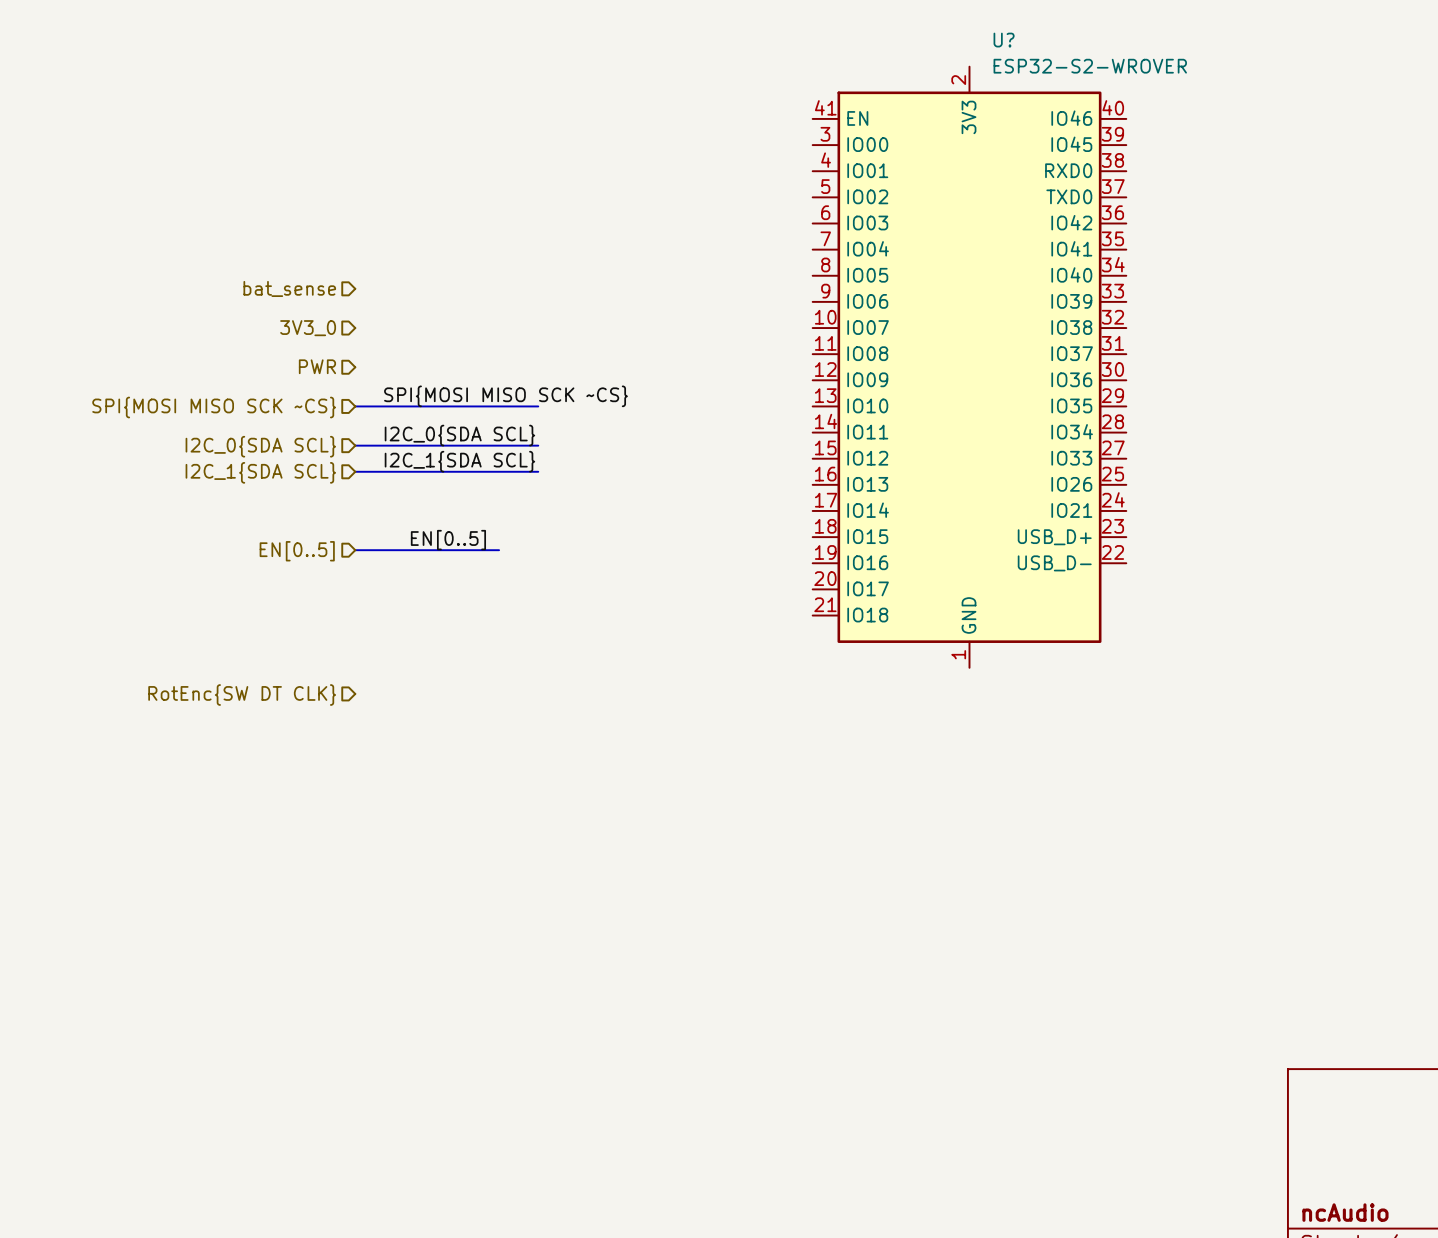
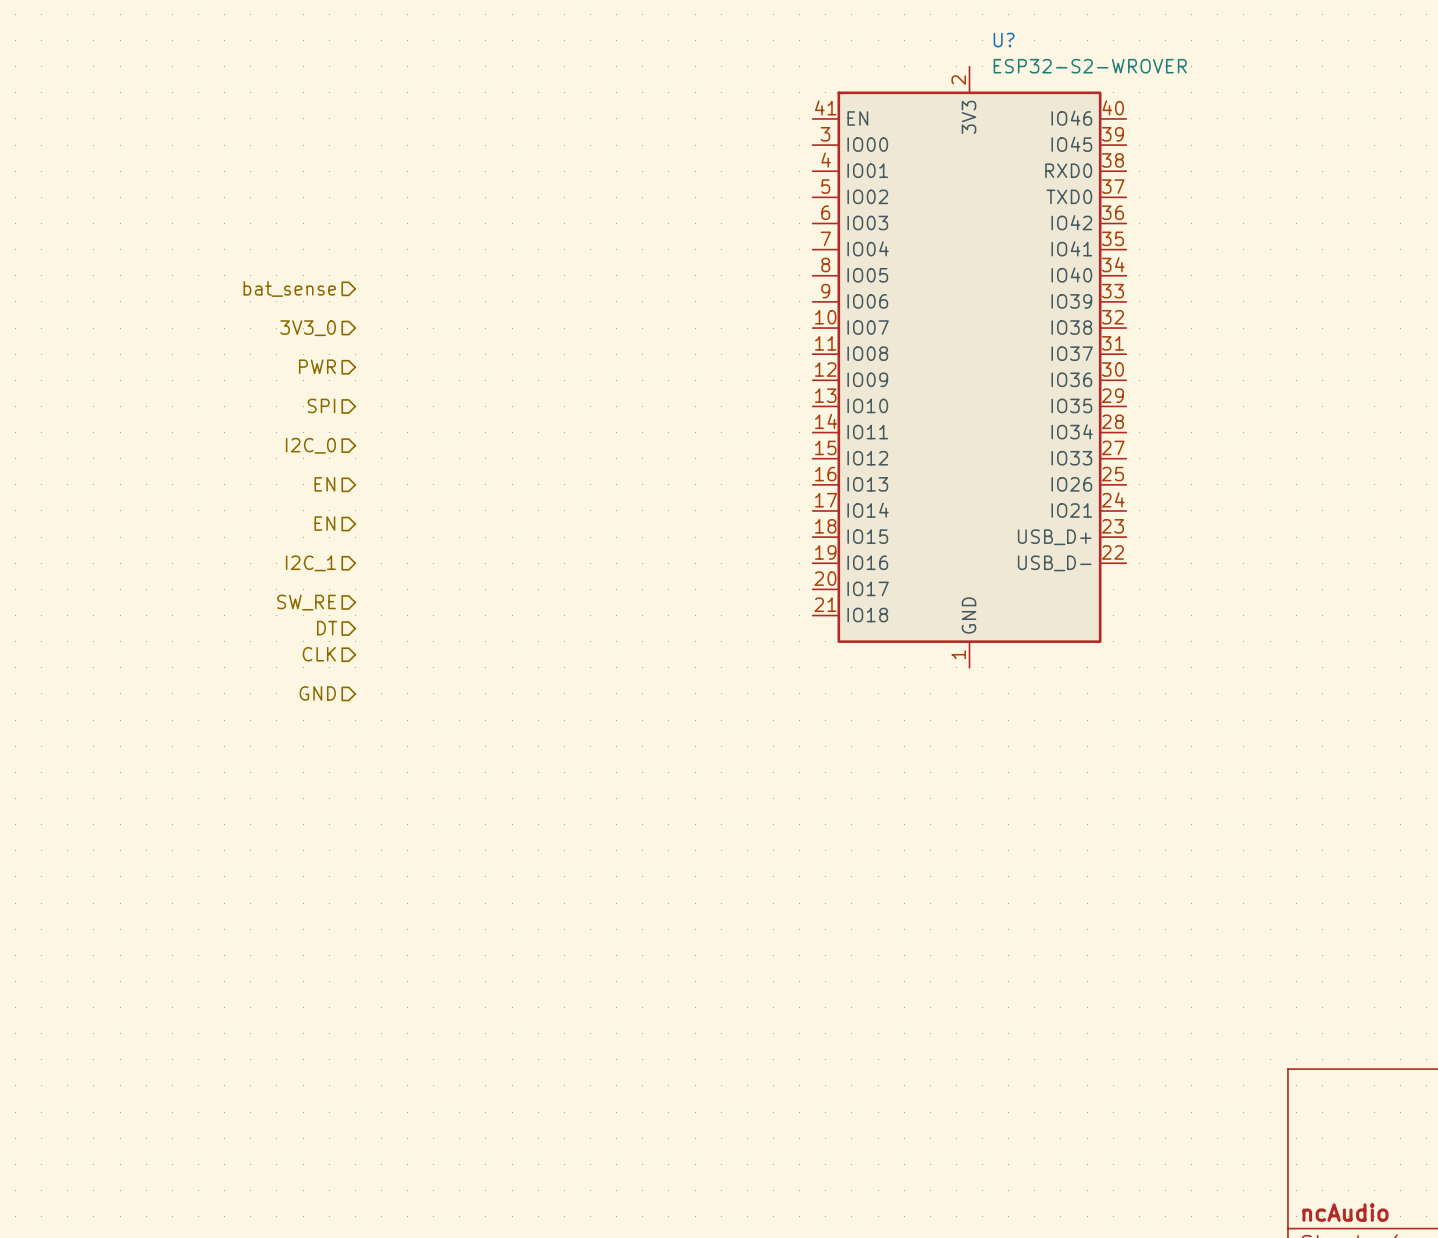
label: SPI{MOSI MISO SCK ~CS} (505, 396) -> none
bus: (355, 406) (538, 406) -> none
hierarchical label: SPI{MOSI MISO SCK ~CS} (214, 407) -> SPI (321, 405)
label: I2C_0{SDA SCL} (459, 435) -> none
bus: (355, 445) (538, 445) -> none
hierarchical label: I2C_0{SDA SCL} (260, 446) -> I2C_0 (310, 445)
label: I2C_1{SDA SCL} (459, 461) -> none
bus: (355, 471) (538, 471) -> none
hierarchical label: I2C_1{SDA SCL} (260, 472) -> none
hierarchical label: none -> EN (324, 484)
hierarchical label: none -> EN (324, 523)
label: EN[0..5] (448, 540) -> none
bus: (355, 550) (499, 550) -> none
hierarchical label: EN[0..5] (297, 551) -> none
hierarchical label: none -> I2C_1 (310, 563)
hierarchical label: none -> SW_RE (306, 602)
hierarchical label: none -> DT (327, 628)
hierarchical label: none -> CLK (319, 654)
hierarchical label: RotEnc{SW DT CLK} (242, 695) -> GND (317, 693)

